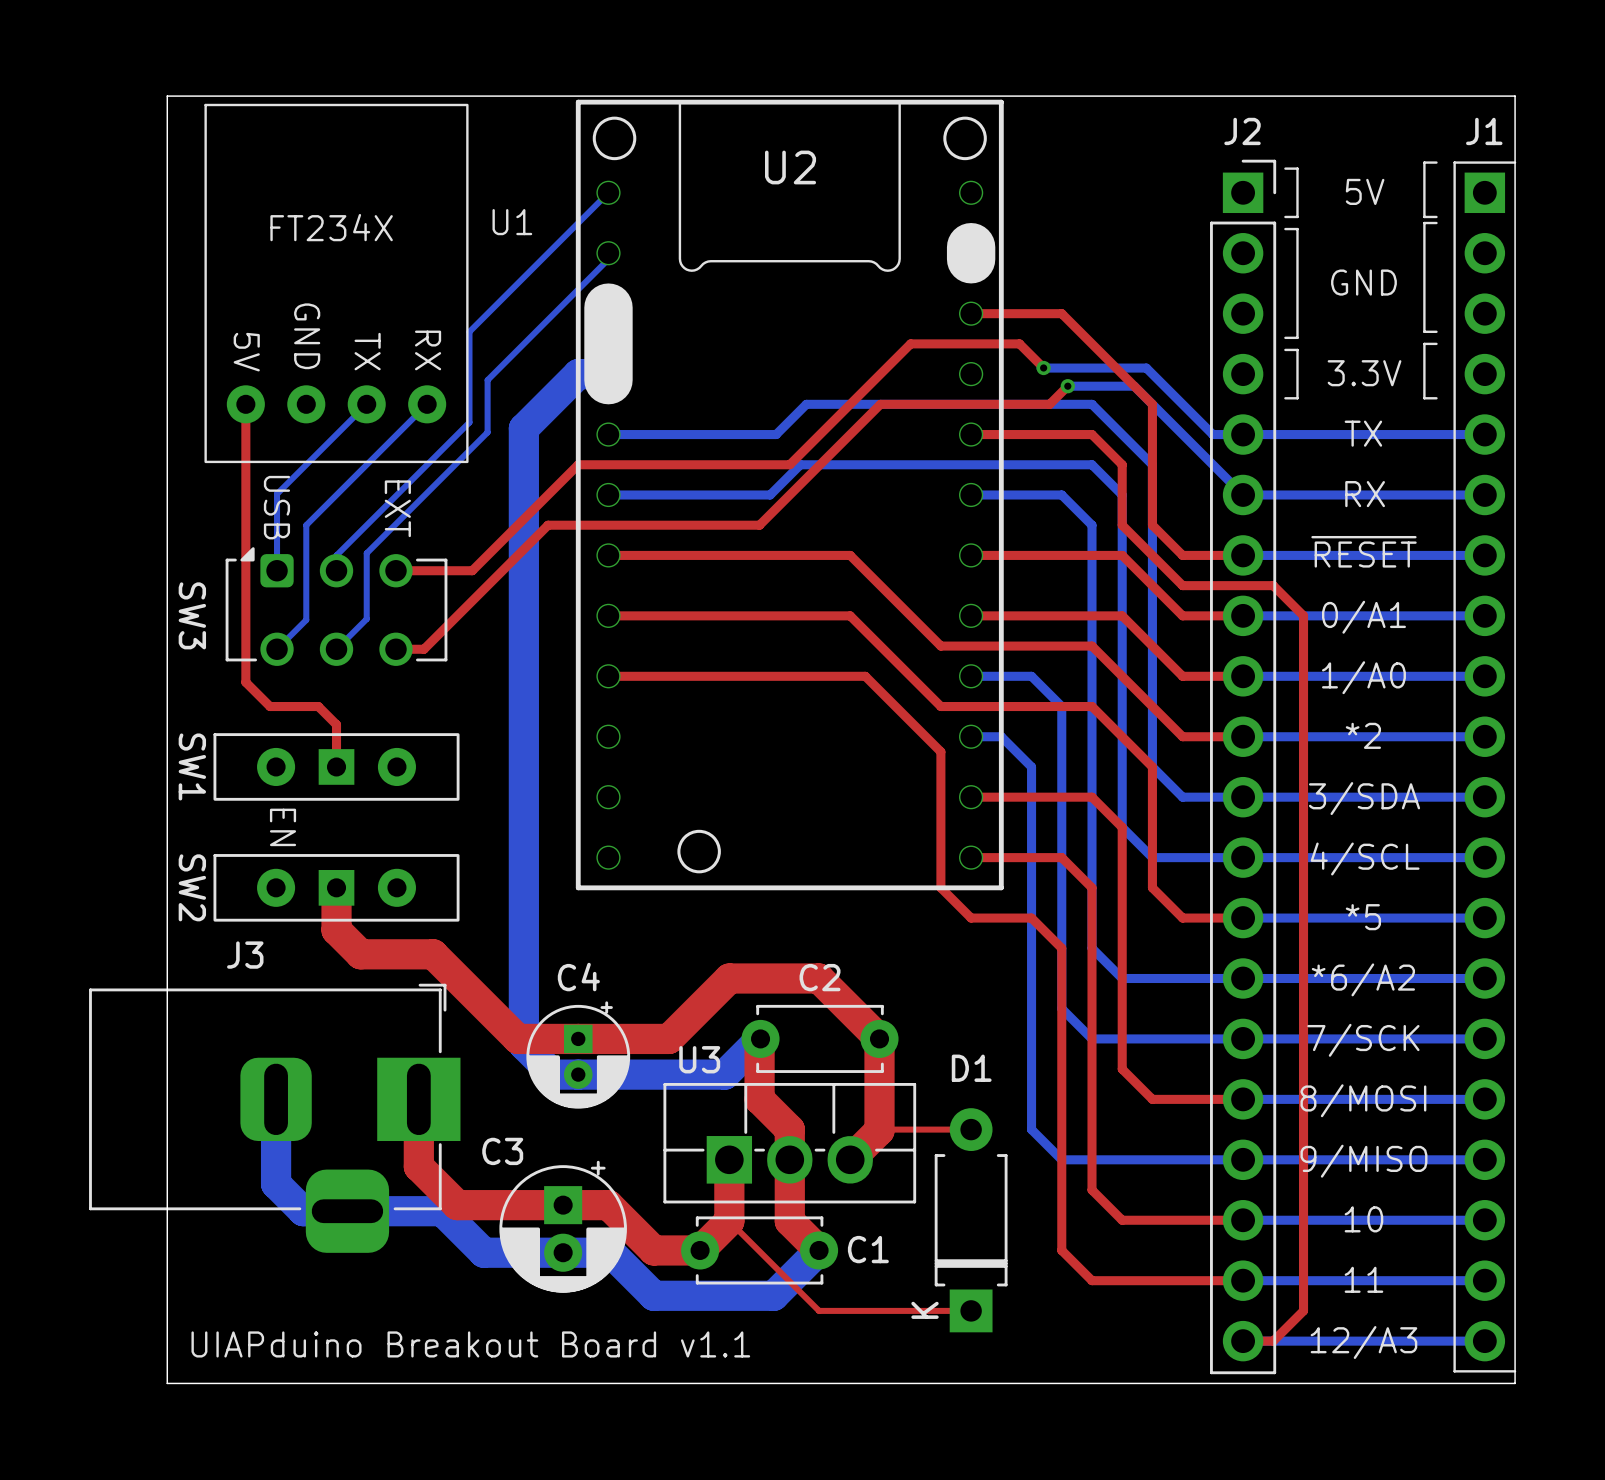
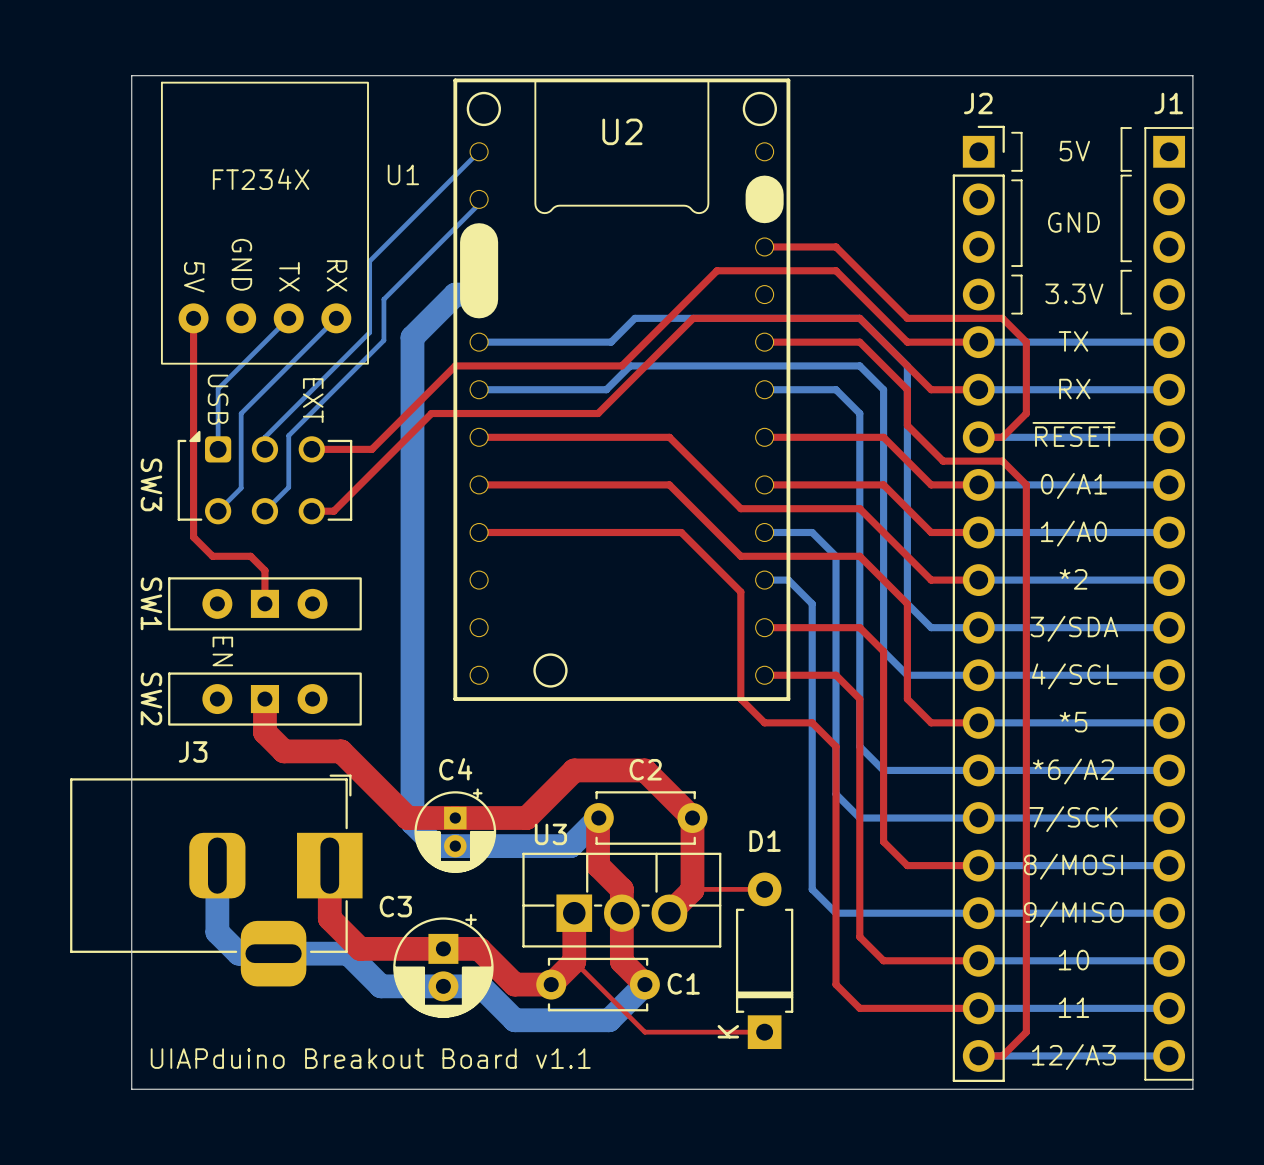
top track: (1019, 343) (1043, 367) -> (802, 270) (836, 270) (907, 342) (978, 342)
via: (1043, 367) -> none
bottom track: (1043, 368) (1146, 368) (1212, 434) (1243, 434) -> none
top track: (1067, 386) (1049, 404) -> (978, 389) (931, 389) (859, 318) (826, 318)
bottom track: (1067, 386) (1134, 386) (1243, 494) -> none
via: (1067, 386) -> none
top track: (1152, 404) (1152, 494) -> (883, 365) (907, 389)
top track: none -> (907, 318) (1002, 318) (1026, 342) (1026, 413) (1002, 437) (978, 437)
top track: (1122, 464) (1122, 525) (1182, 585) (1197, 585) -> none
top track: (1152, 525) (1182, 555) (1243, 555) -> (907, 413) (907, 425) (943, 461)

